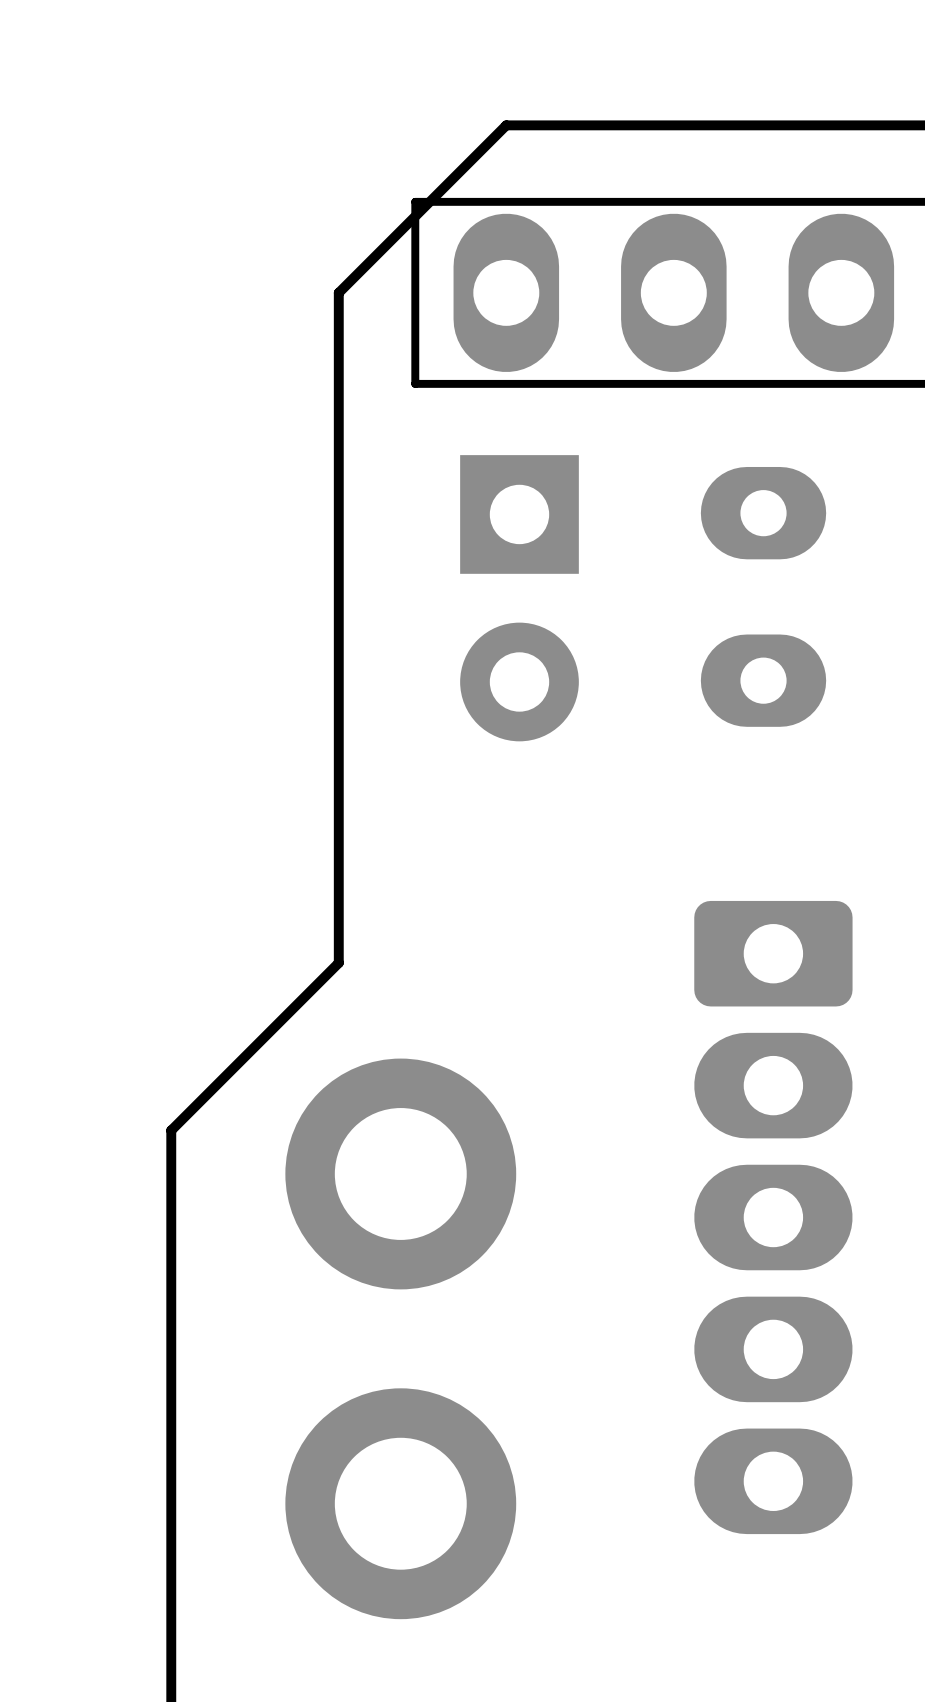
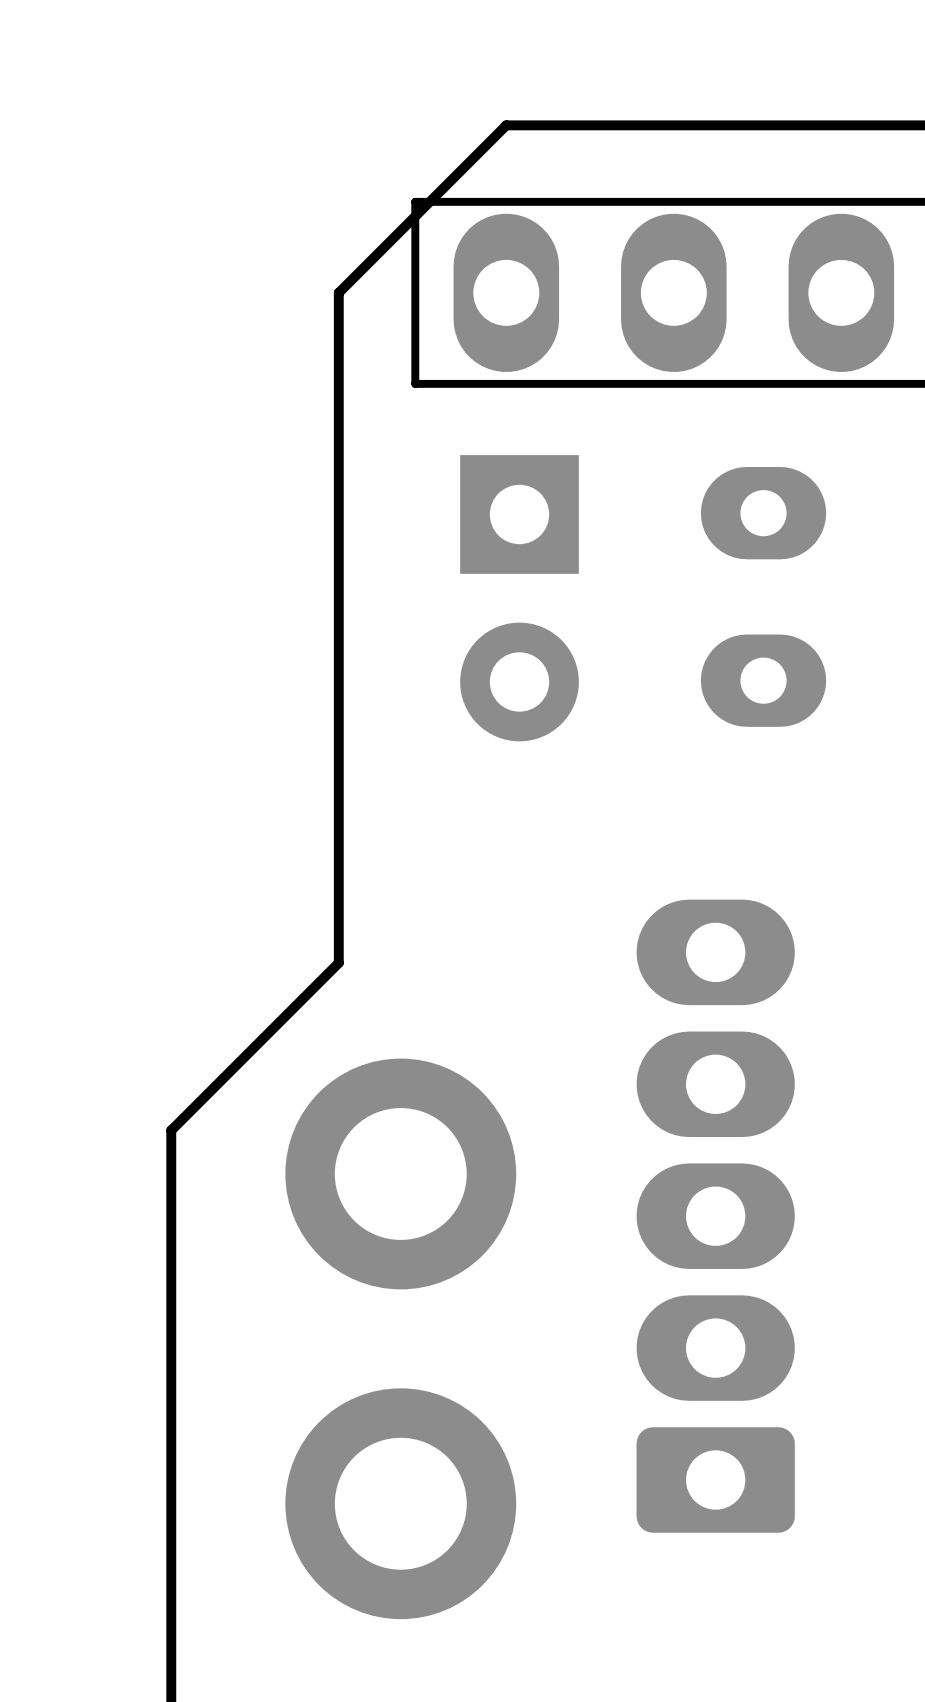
part rotation: 0° (773, 1217) -> 180° (715, 1216)

